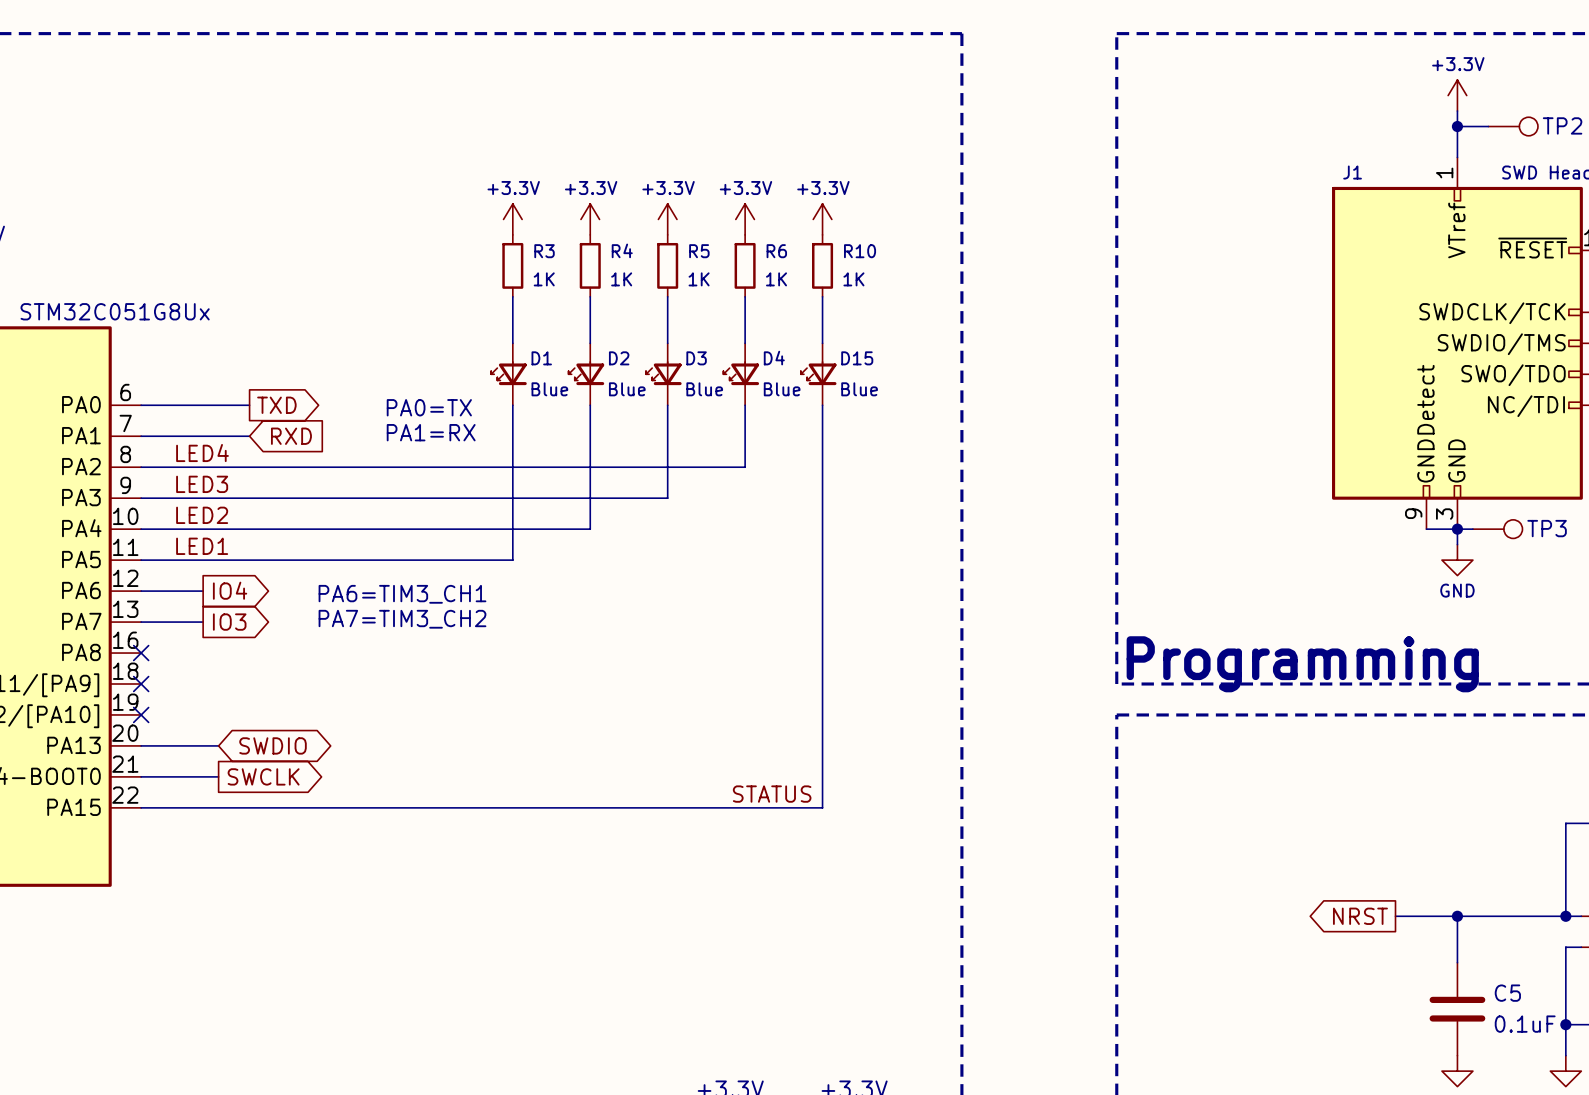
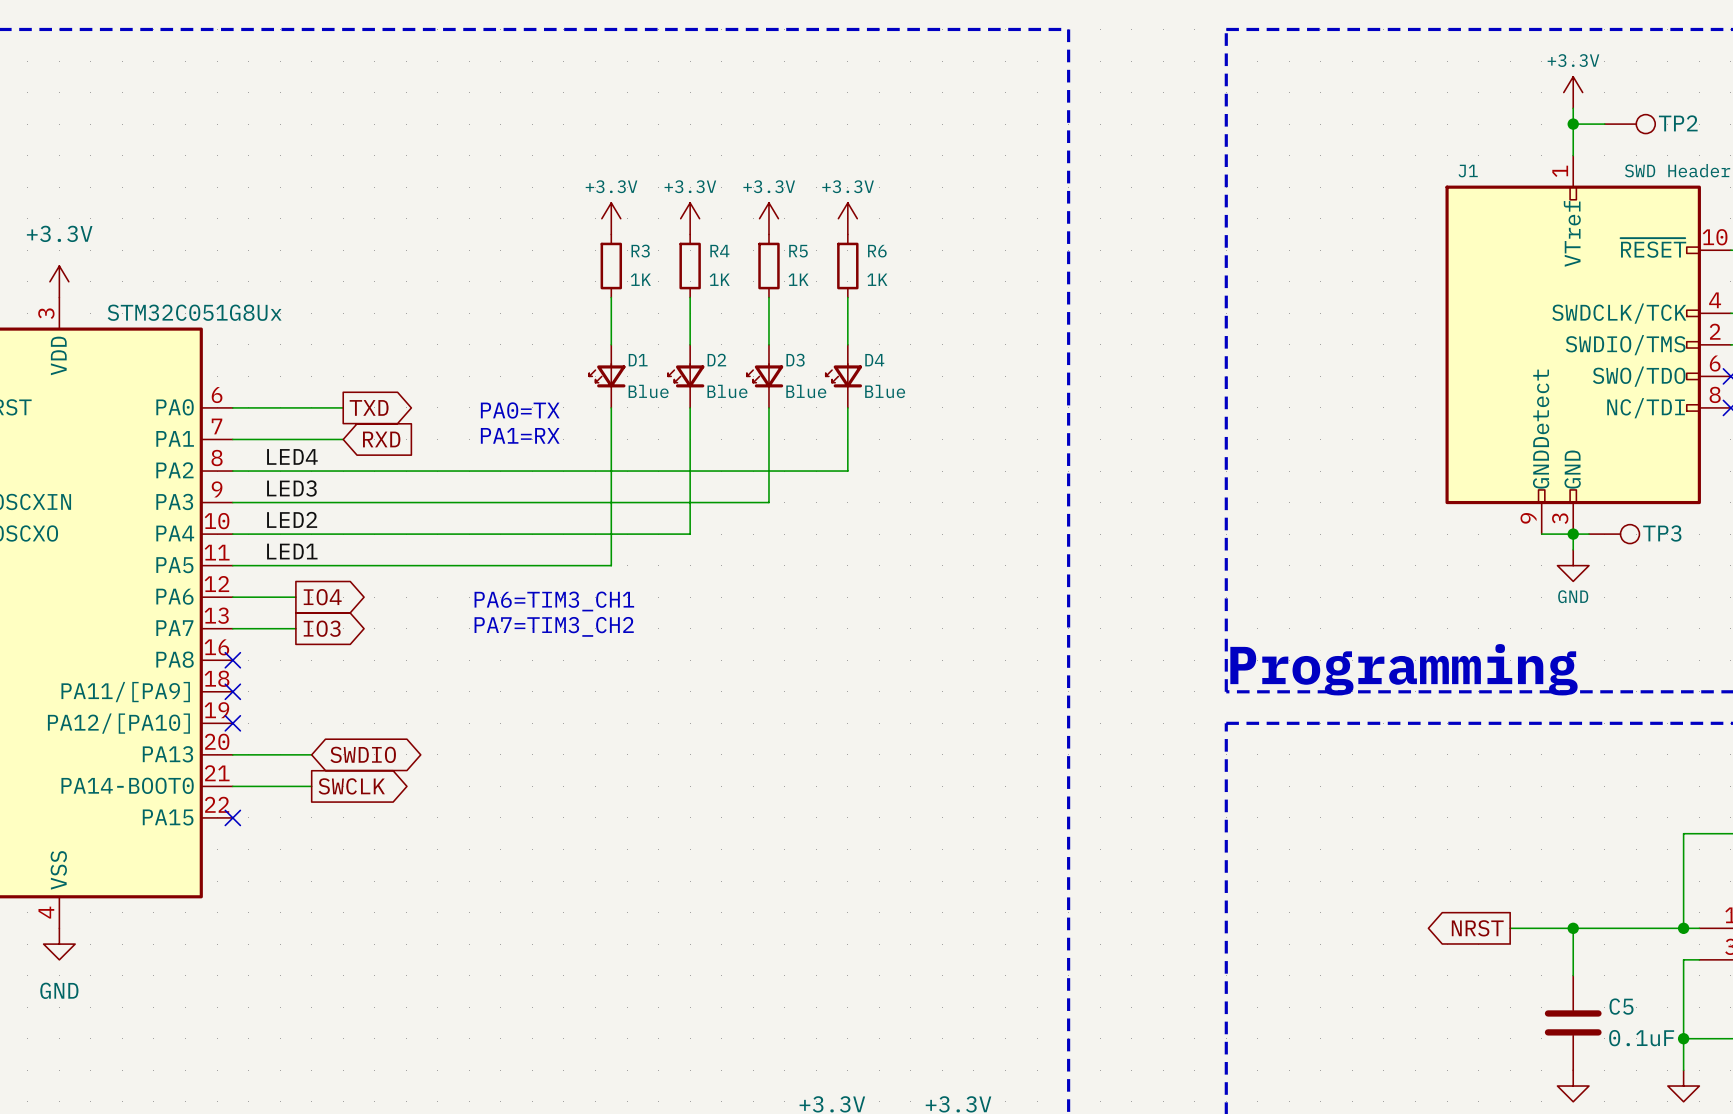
power symbol: +3.3V (822, 219) -> none
R10: 1K (822, 265) -> none
wire: (822, 296) (822, 343) -> none
D15: Blue (818, 374) -> none
wire: (822, 405) (822, 807) (141, 807) -> none
text position: PA6=TIM3_CH1 (402, 594) -> PA6=TIM3_CH1 (554, 601)
text position: PA7=TIM3_CH2 (402, 619) -> PA7=TIM3_CH2 (554, 626)
label: STATUS (772, 794) -> none
no-connect mark: none -> (232, 817)

